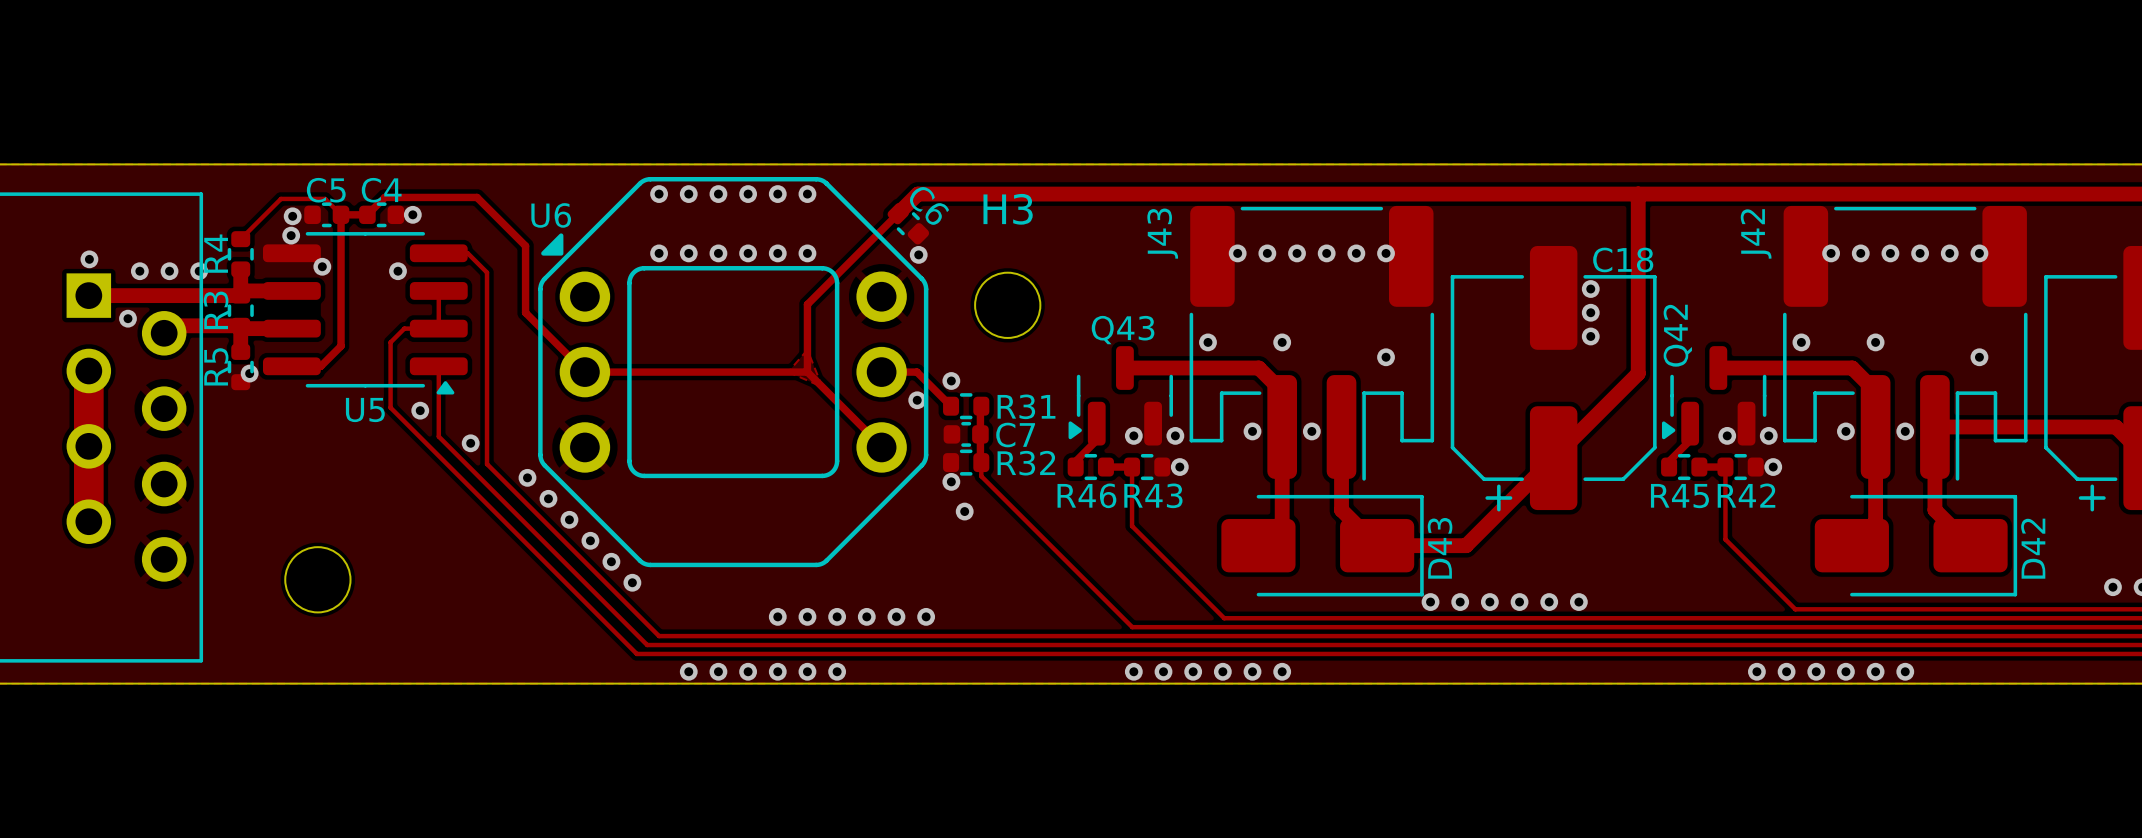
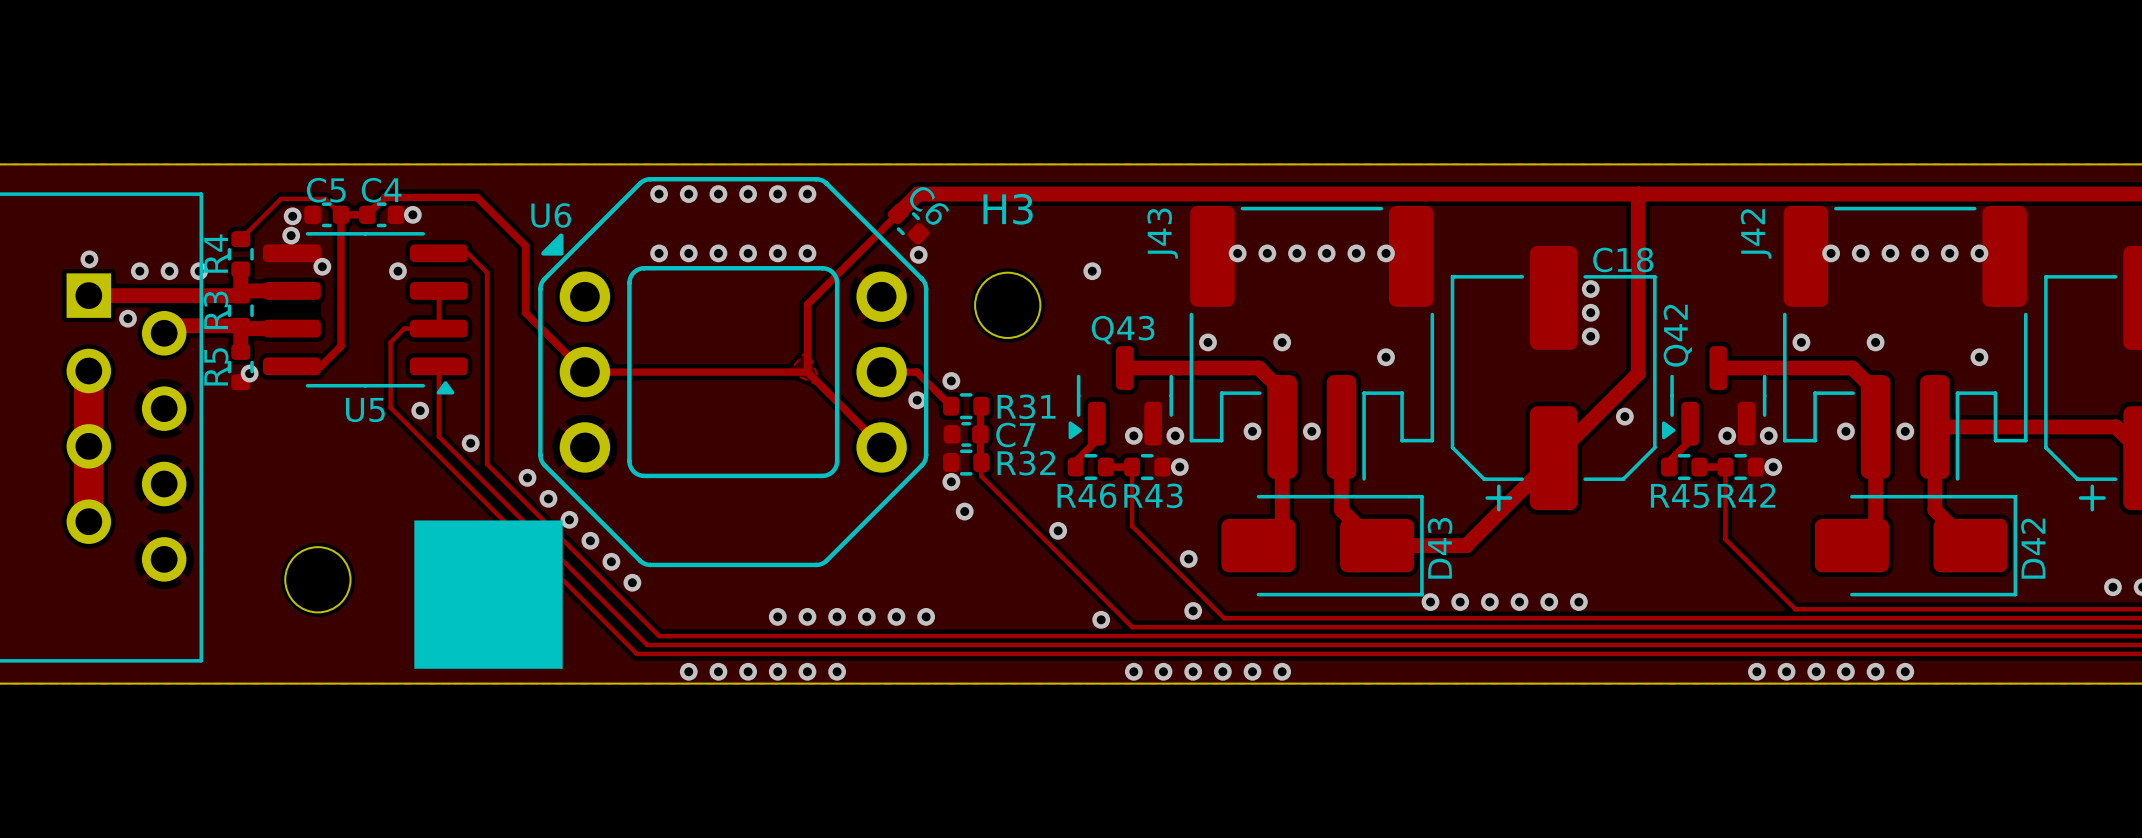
via: none -> (1092, 271)
via: none -> (1624, 416)
drawing: none -> [414, 520, 563, 669]
via: none -> (1058, 530)
via: none -> (1188, 559)
via: none -> (1193, 610)
via: none -> (1101, 619)

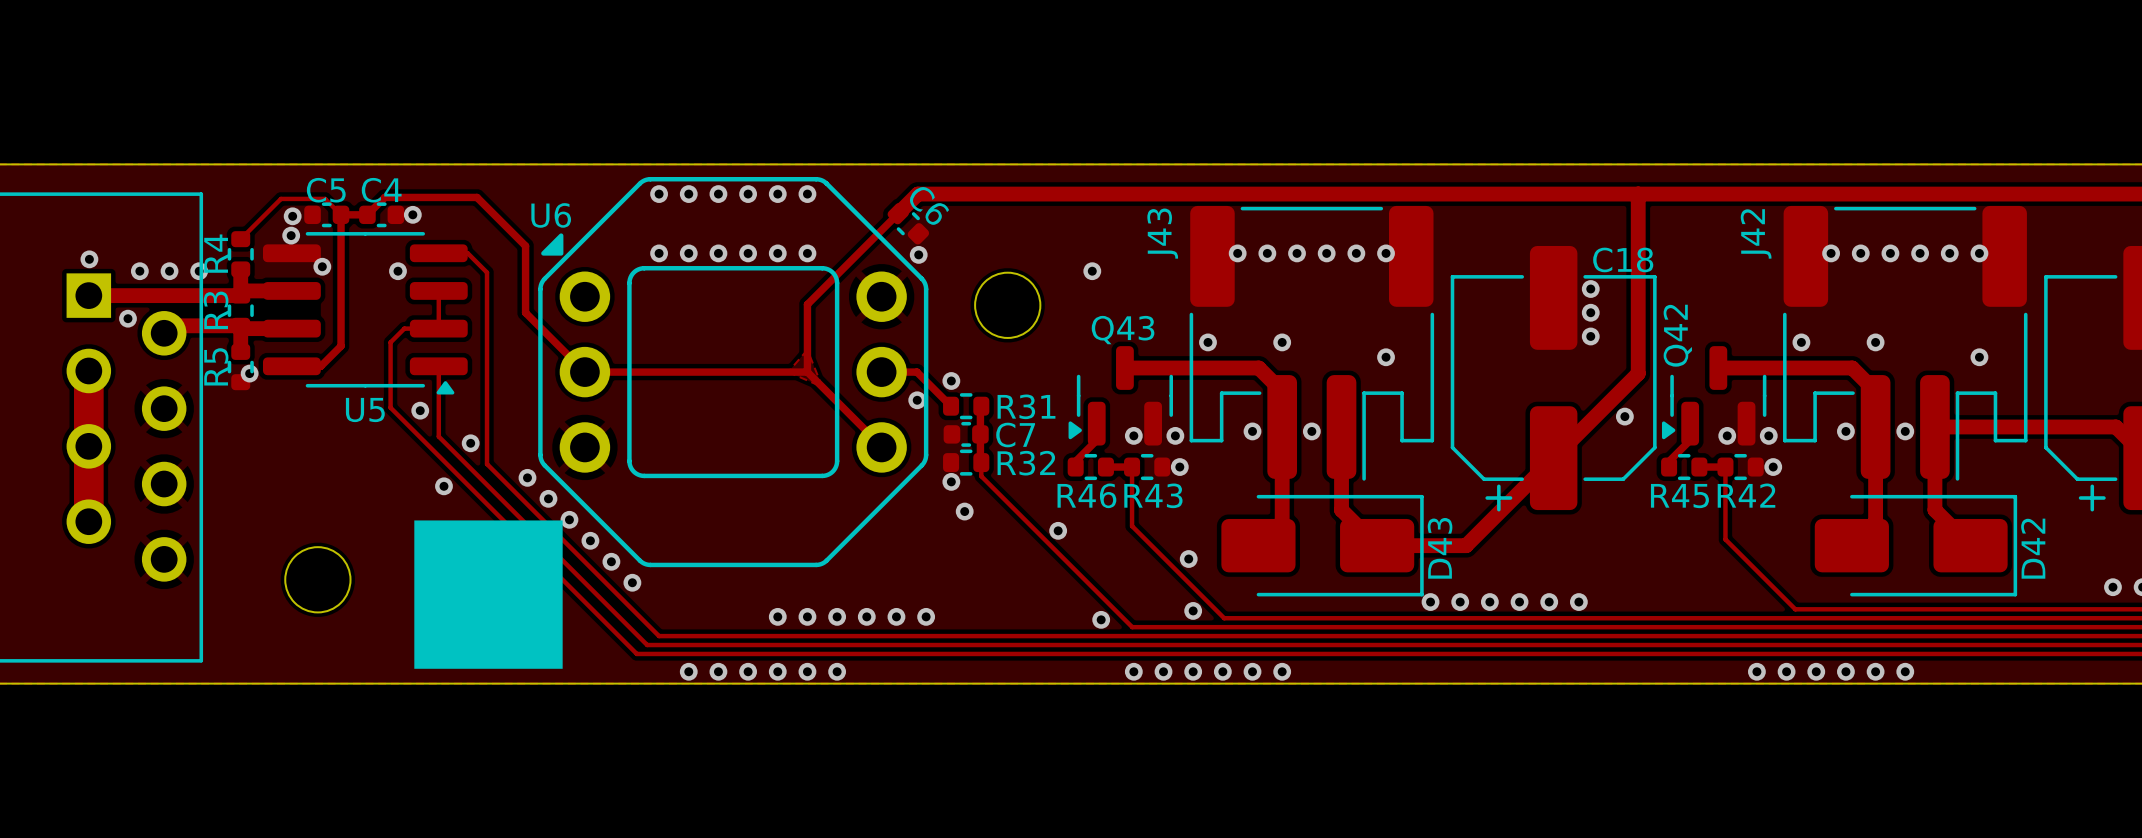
H3 name: H3 (1008, 209) -> none
via: none -> (443, 486)

